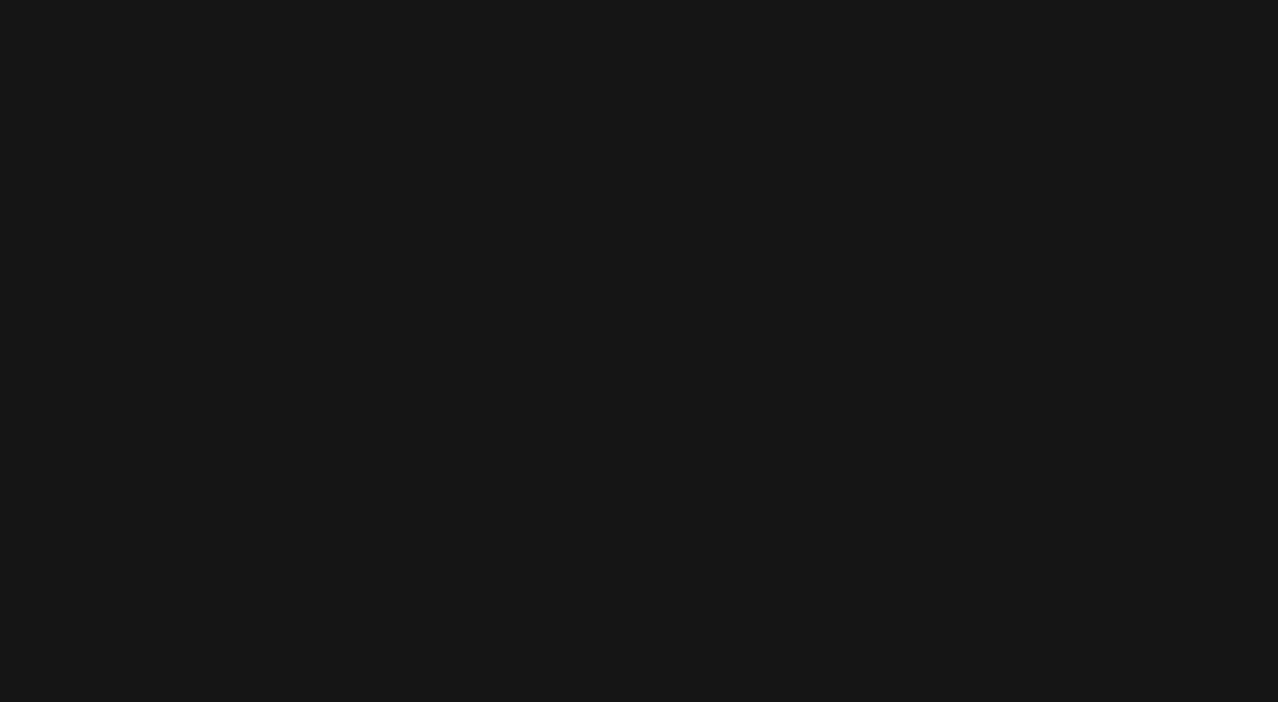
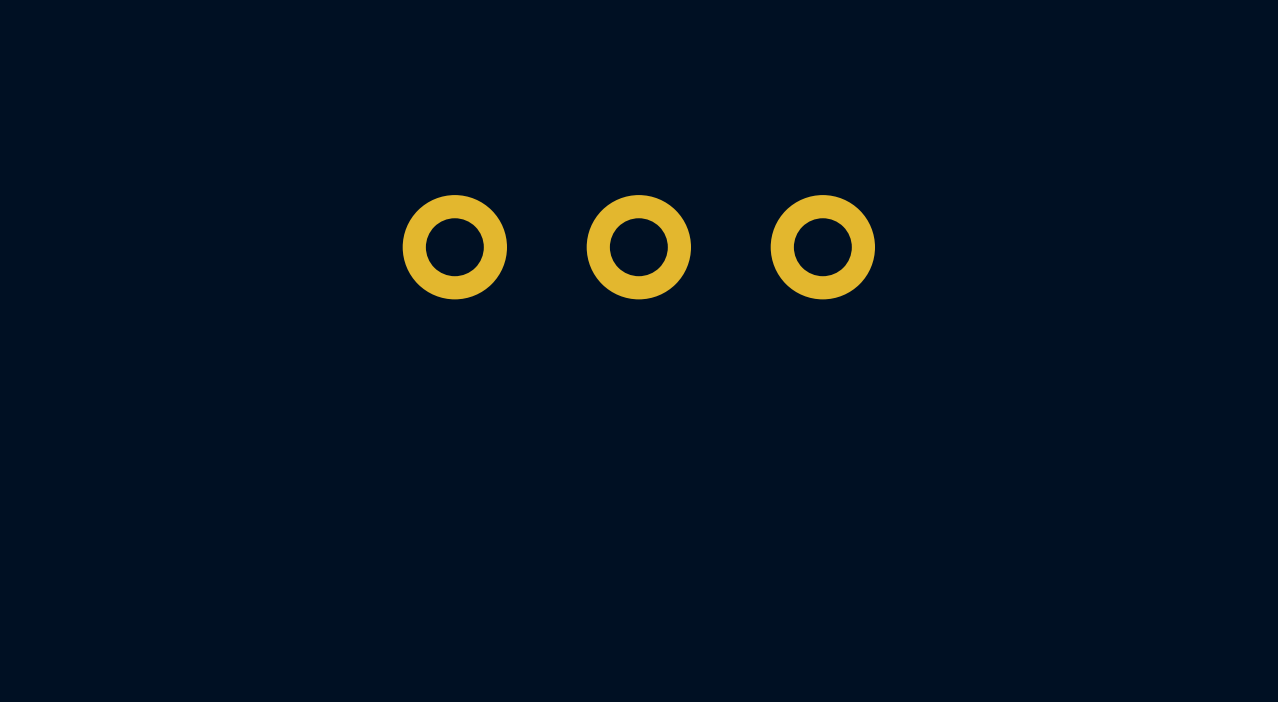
part: none -> (638, 247)

